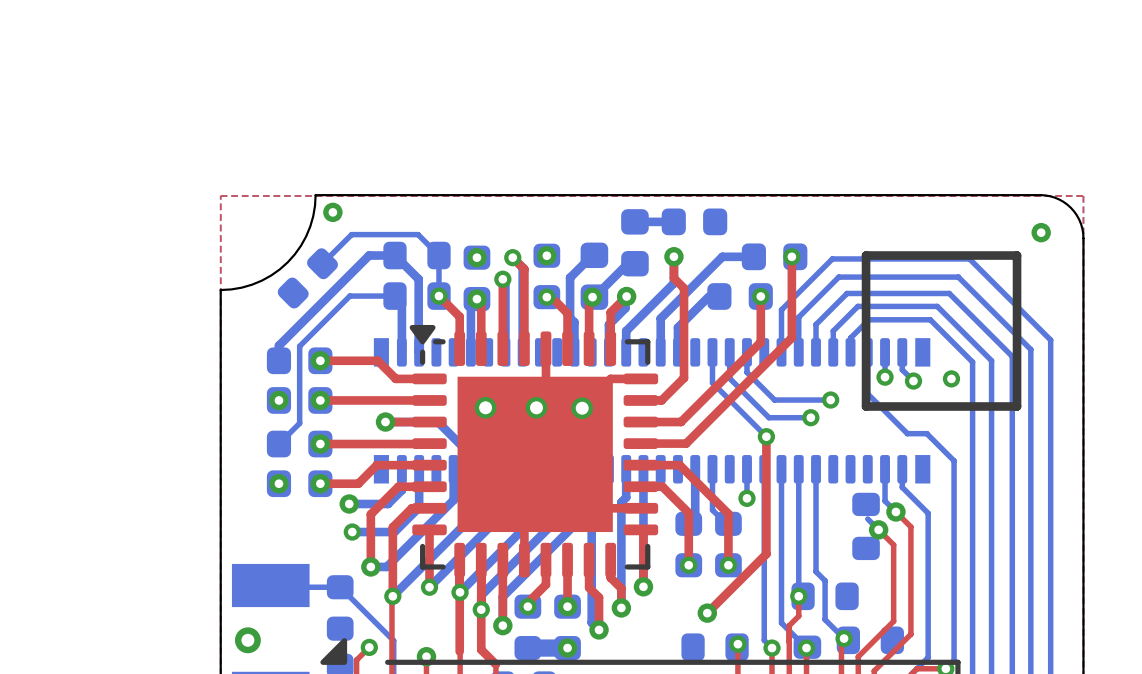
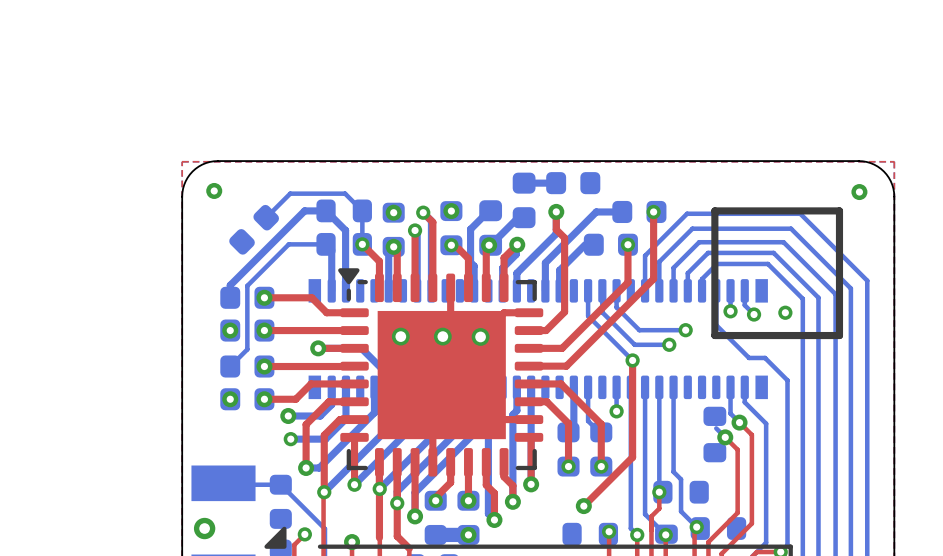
board edge: (315, 195) (310, 226) (301, 245) (287, 262) (271, 275) (252, 284) (220, 290) -> (260, 161) (213, 161) (202, 164) (192, 171) (185, 181) (182, 192) (182, 239)
via position: (332, 212) -> (214, 190)

